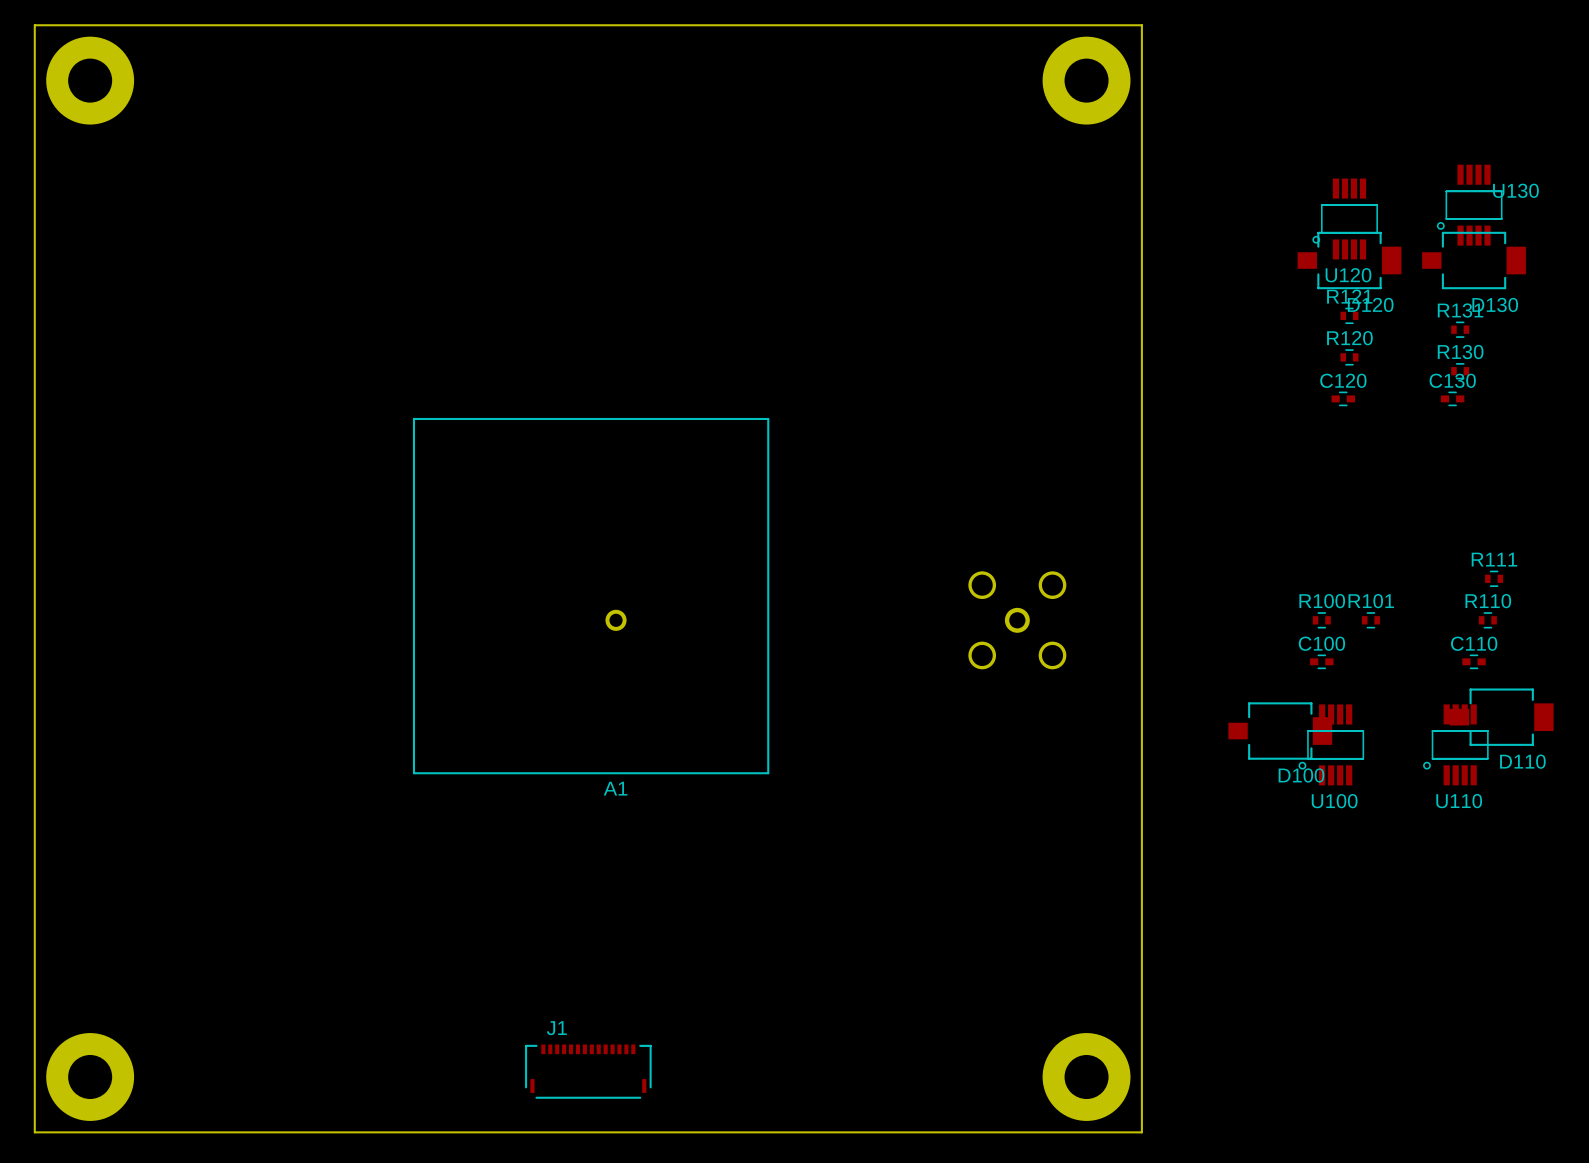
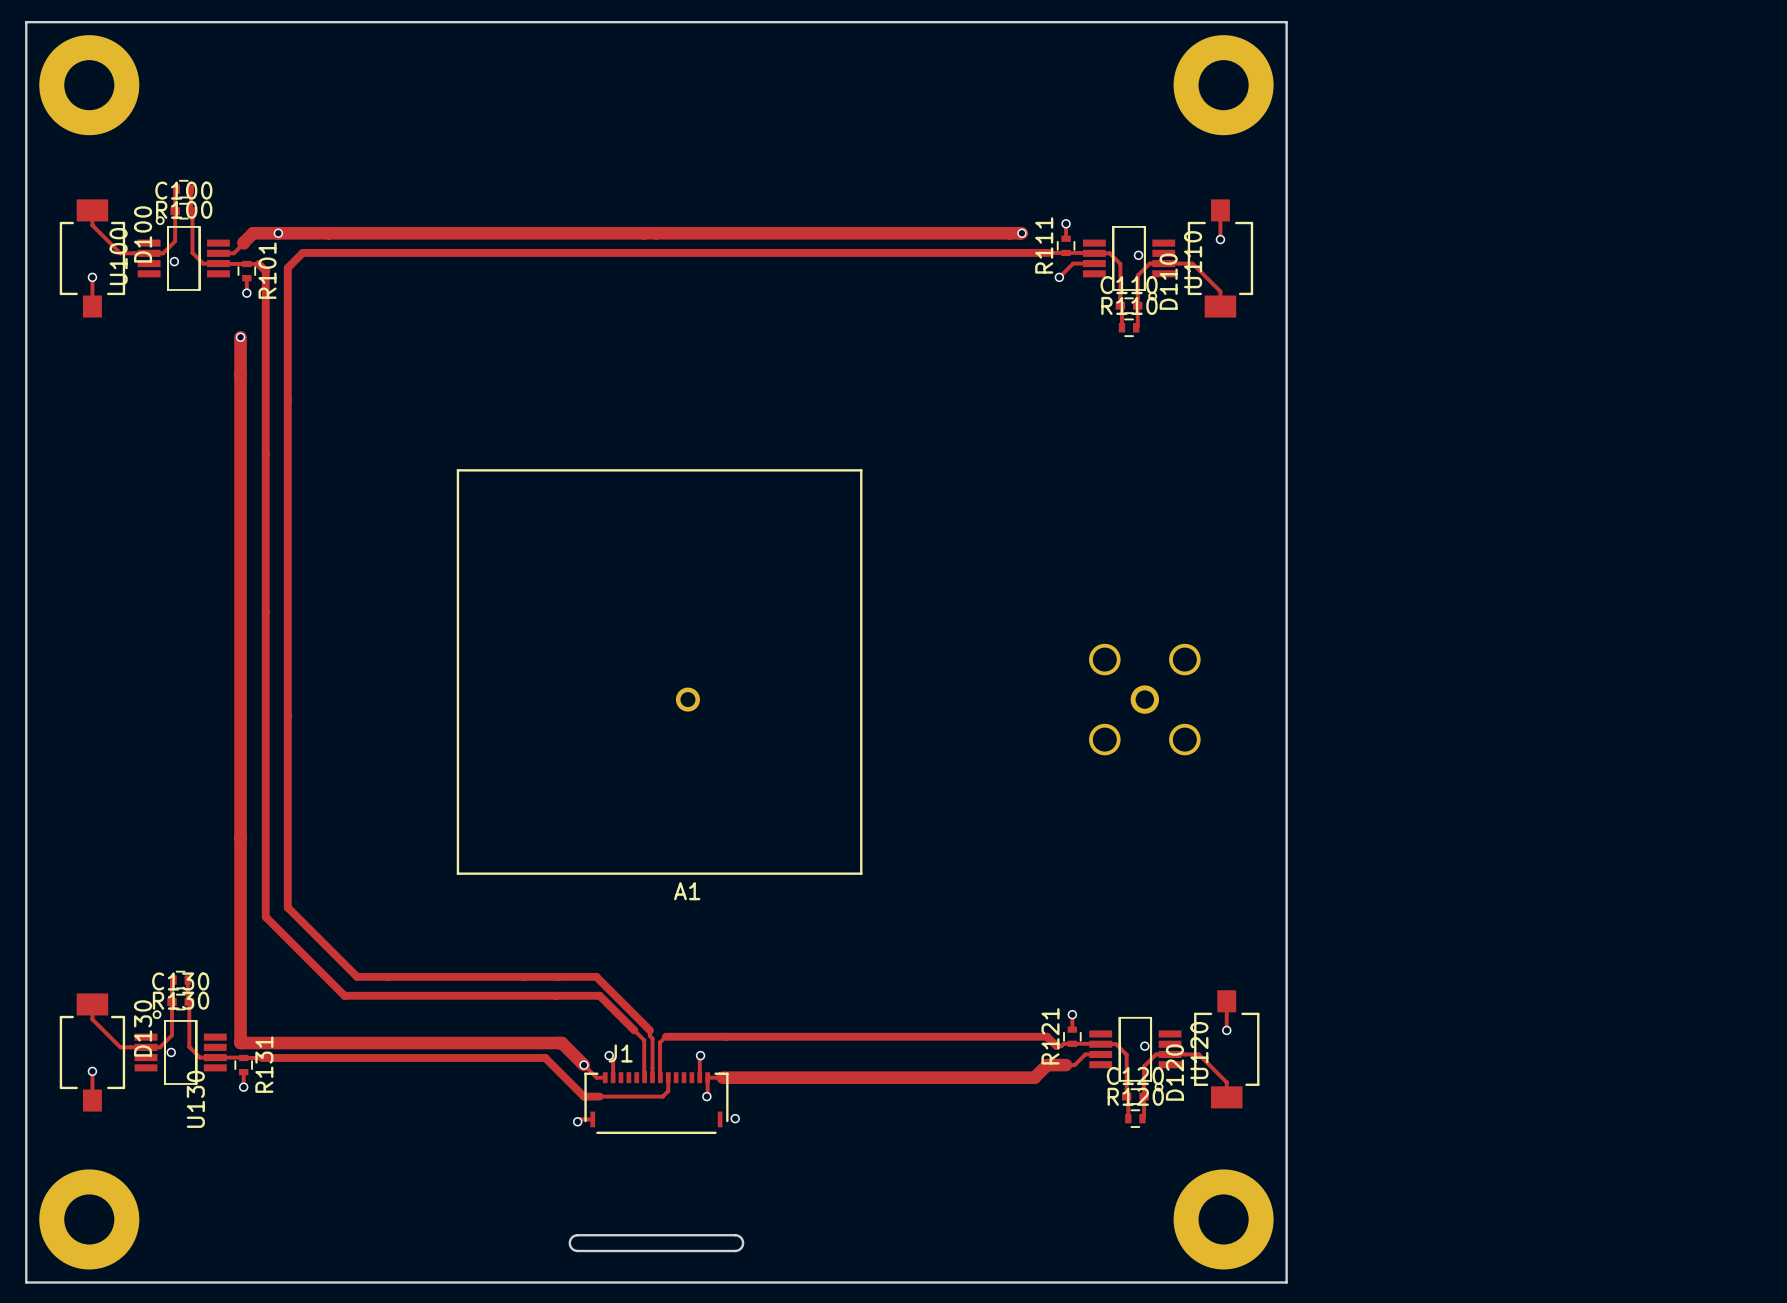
track: none -> (176, 189) (175, 190) (175, 241) (163, 253) (120, 253) (92, 225) (92, 210)
track: none -> (190, 189) (192, 252) (203, 263) (258, 263) (265, 271) (265, 916) (344, 995) (599, 995) (644, 1040) (644, 1077)
track: none -> (1220, 210) (1220, 239)
track: none -> (1066, 223) (1066, 238)
via: none -> (1066, 223)
U130 rotation: 0° (1469, 205) -> 90° clockwise (180, 1047)
U130 position: (1469, 205) -> (180, 1047)
via: none -> (278, 233)
track: none -> (1021, 233) (253, 233) (233, 253) (218, 253)
via: none -> (1021, 233)
via: none -> (1220, 239)
U120 rotation: 0° (1345, 219) -> 90° counterclockwise (1135, 1054)
U120 position: (1345, 219) -> (1135, 1054)
via: none -> (1138, 255)
via: none -> (174, 261)
track: none -> (1094, 263) (1073, 263) (1059, 277)
track: none -> (92, 277) (92, 306)
via: none -> (92, 277)
via: none -> (1059, 277)
track: none -> (246, 278) (246, 293)
D120 rotation: 0° (1349, 260) -> 90° clockwise (1226, 1049)
D120 position: (1349, 260) -> (1226, 1049)
D130 rotation: 0° (1474, 260) -> 90° counterclockwise (92, 1052)
D130 position: (1474, 260) -> (92, 1052)
via: none -> (246, 293)
track: none -> (1220, 306) (1220, 291) (1192, 263) (1149, 263) (1137, 275) (1137, 326) (1136, 327)
track: none -> (1121, 327) (1120, 263) (1109, 253) (302, 252) (287, 267) (287, 907) (357, 976) (596, 976) (649, 1030) (649, 1035) (652, 1038) (652, 1077)
track: none -> (240, 337) (240, 1043) (561, 1043) (596, 1077) (605, 1077)
via: none -> (240, 337)
R121 rotation: 0° (1349, 315) -> 90° clockwise (1072, 1036)
R121 position: (1349, 315) -> (1072, 1036)
R131 rotation: 0° (1460, 329) -> 90° clockwise (243, 1065)
R131 position: (1460, 329) -> (243, 1065)
R130 name position: R130 (1460, 352) -> R130 (181, 1000)
R120 position: (1349, 357) -> (1135, 1118)
R130 position: (1460, 371) -> (180, 980)
C120 position: (1343, 398) -> (1135, 1096)
C130 position: (1452, 398) -> (180, 1002)
R111 rotation: 0° (1494, 578) -> 90° clockwise (1066, 245)
R111 position: (1494, 578) -> (1066, 245)
R100 name position: R100 (1322, 601) -> R100 (184, 209)
R100 position: (1321, 620) -> (183, 189)
R101 rotation: 0° (1370, 620) -> 90° clockwise (246, 271)
R101 position: (1370, 620) -> (246, 271)
R110 position: (1487, 620) -> (1129, 327)
C100 position: (1321, 661) -> (183, 211)
C110 position: (1474, 661) -> (1129, 305)
D110 rotation: 0° (1501, 717) -> 90° clockwise (1220, 258)
D110 position: (1501, 717) -> (1220, 258)
D100 rotation: 0° (1280, 731) -> 90° counterclockwise (92, 258)
D100 position: (1280, 731) -> (92, 258)
U100 rotation: 0° (1331, 744) -> 90° clockwise (183, 253)
U100 position: (1331, 744) -> (183, 253)
U110 rotation: 0° (1455, 744) -> 90° counterclockwise (1129, 263)
U110 position: (1455, 744) -> (1129, 263)
track: none -> (173, 980) (172, 981) (172, 1035) (159, 1047) (120, 1047) (92, 1019) (92, 1004)
track: none -> (187, 980) (189, 1046) (199, 1057) (545, 1057) (583, 1096) (662, 1096) (668, 1091) (668, 1077)
track: none -> (1226, 1001) (1226, 1030)
track: none -> (1072, 1014) (1072, 1029)
via: none -> (1072, 1014)
via: none -> (1226, 1030)
via: none -> (1144, 1046)
via: none -> (171, 1052)
track: none -> (1100, 1054) (1085, 1054) (1074, 1065) (1047, 1065) (1034, 1077) (707, 1077) (706, 1096)
track: none -> (609, 1055) (613, 1059) (613, 1077)
via: none -> (609, 1055)
track: none -> (700, 1055) (699, 1077)
via: none -> (700, 1055)
via: none -> (583, 1065)
track: none -> (92, 1071) (92, 1100)
via: none -> (92, 1071)
track: none -> (243, 1072) (243, 1087)
track: none -> (660, 1077) (659, 1042) (665, 1036) (1047, 1036) (1056, 1046) (1063, 1043) (1116, 1044) (1126, 1054) (1128, 1118)
via: none -> (243, 1087)
via: none -> (706, 1096)
track: none -> (1226, 1097) (1226, 1082) (1198, 1054) (1156, 1054) (1144, 1066) (1144, 1117) (1142, 1118)
via: none -> (735, 1118)
track: none -> (592, 1119) (580, 1119) (577, 1121)
via: none -> (577, 1121)
J1 position: (588, 1071) -> (656, 1103)
board edge: none -> (577, 1235) (735, 1235) (740, 1237) (743, 1243) (740, 1248) (735, 1250) (577, 1250) (572, 1248) (569, 1243) (572, 1237) (577, 1235)

